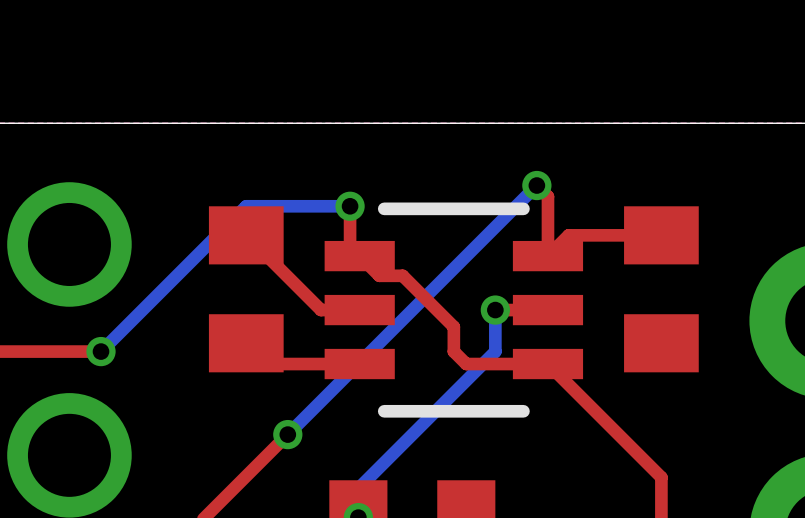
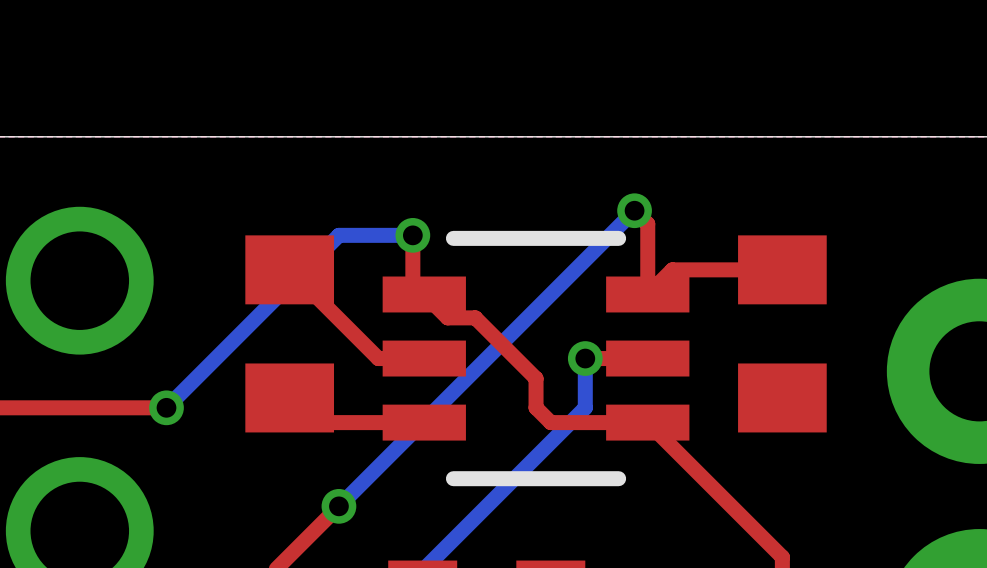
bottom track: (287, 206) (246, 206) (101, 351) -> (338, 235) (166, 407)
top track: none -> (117, 407) (166, 407)
via position: (101, 351) -> (166, 407)

